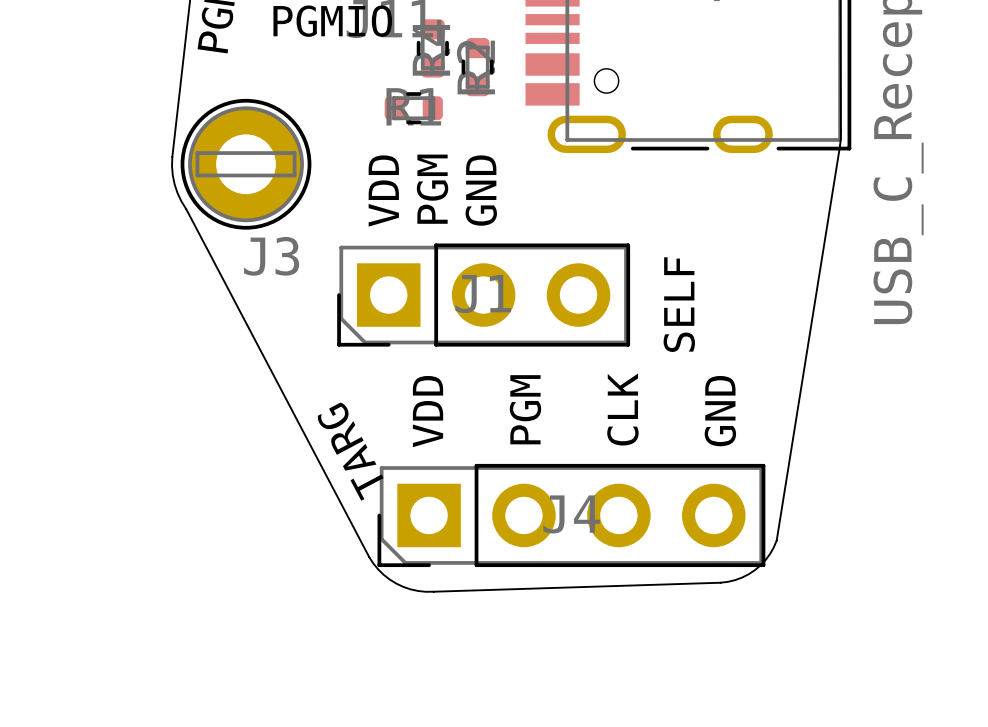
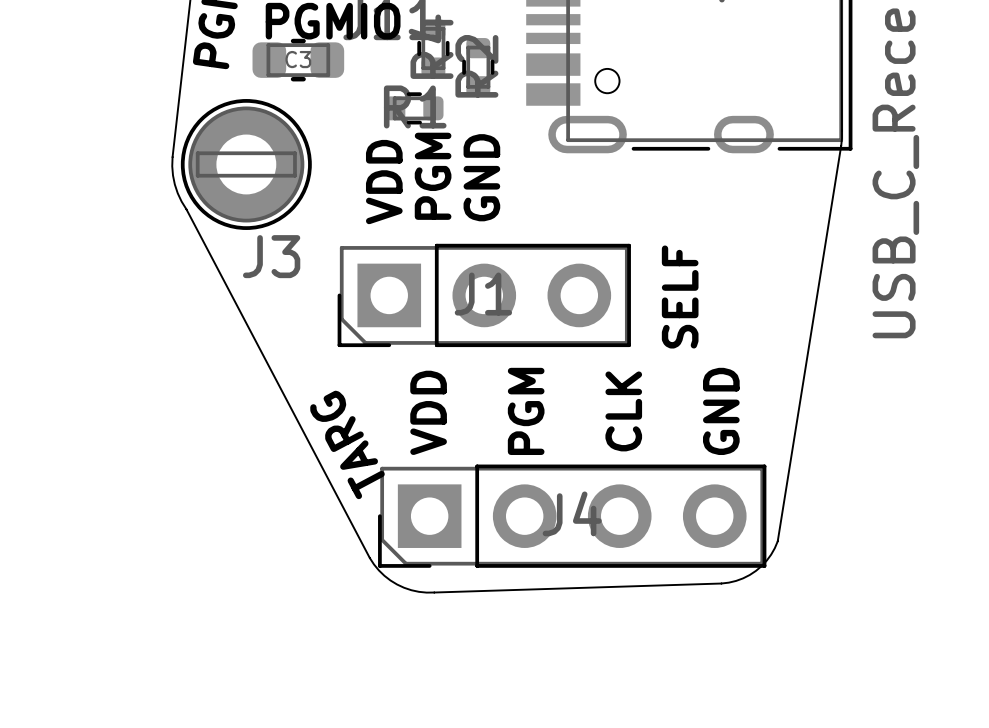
C3: none -> (298, 60)

